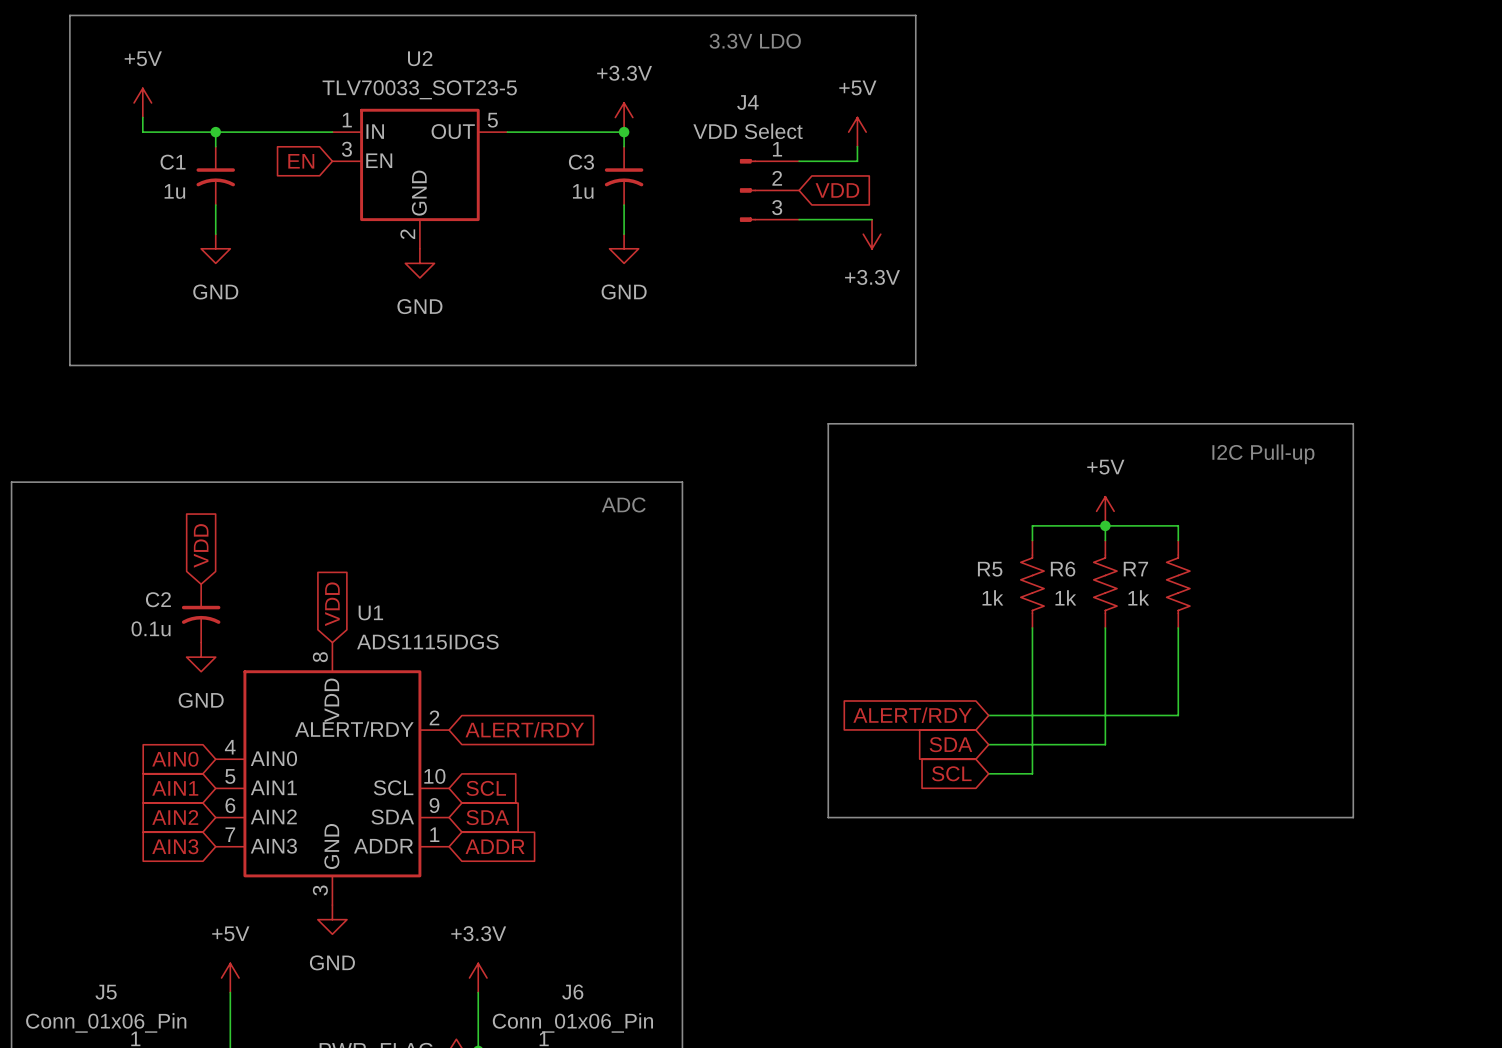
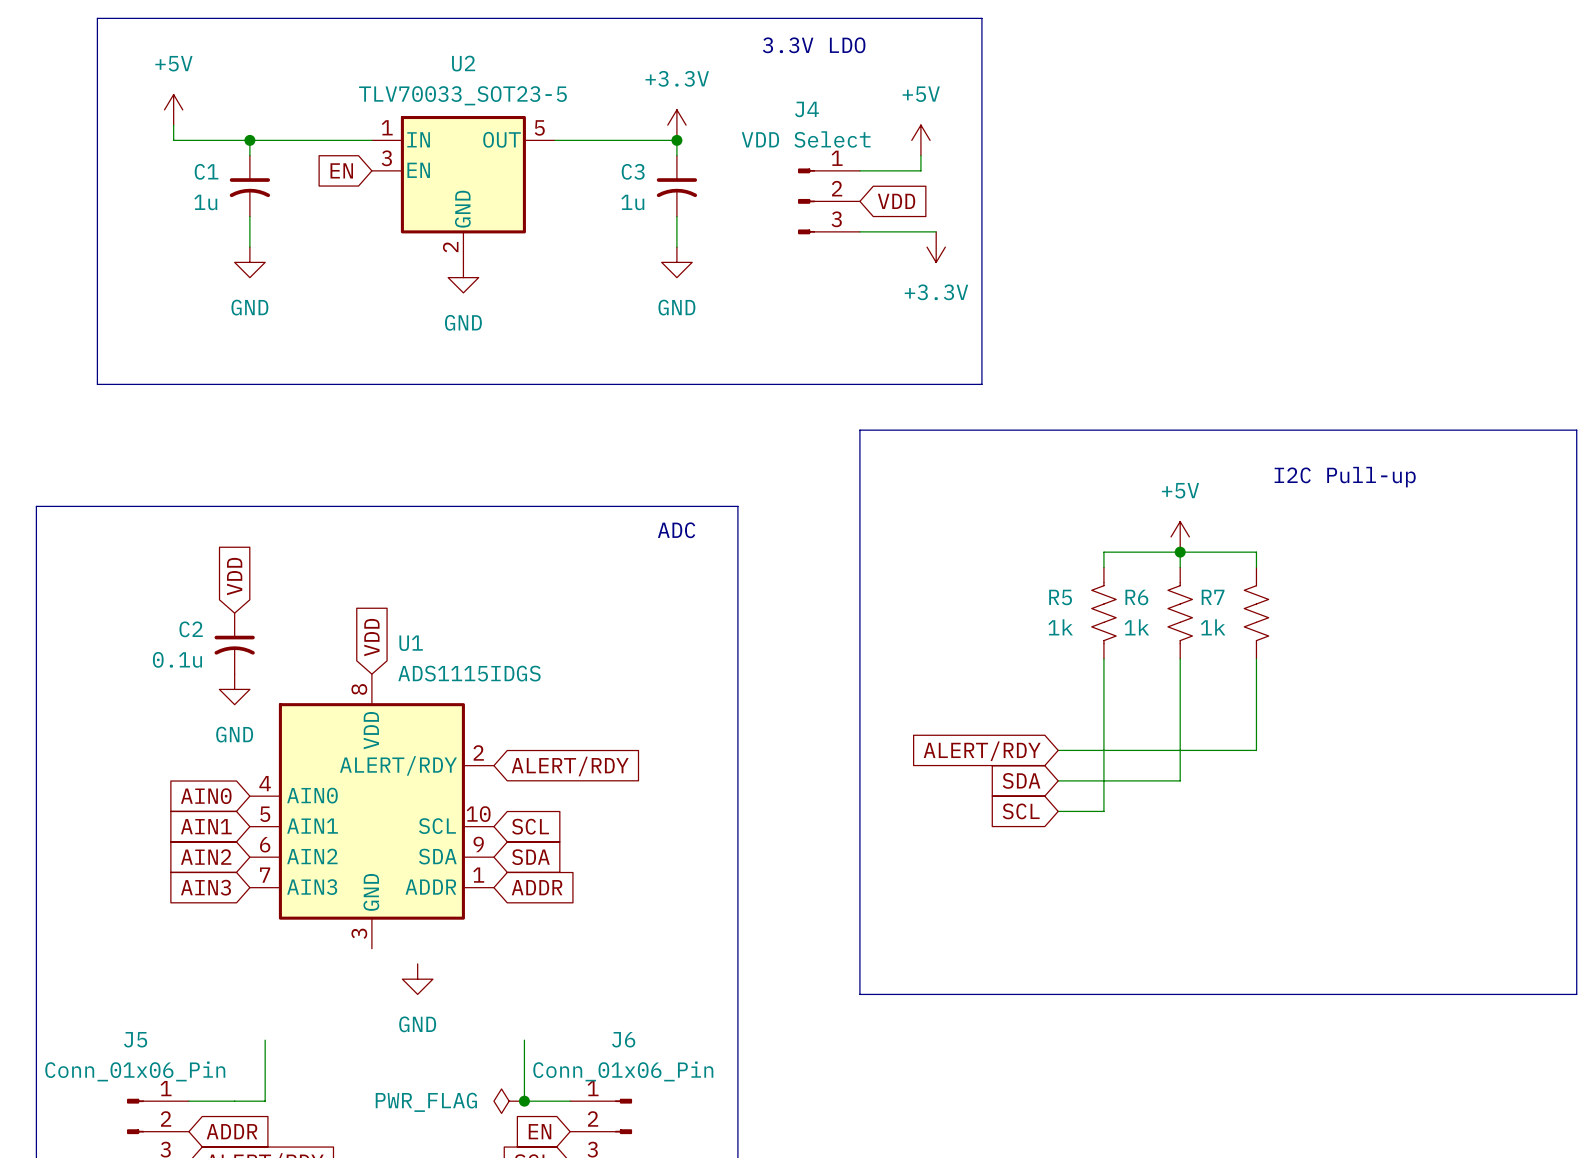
line: (828, 423) (1353, 423) (1353, 817) (828, 817) (828, 423) -> (859, 430) (859, 994) (1576, 994) (1576, 430) (859, 430)
power symbol position: GND (332, 919) -> GND (417, 979)
power symbol: +5V (230, 977) -> none
power symbol: +3.3V (478, 977) -> none

